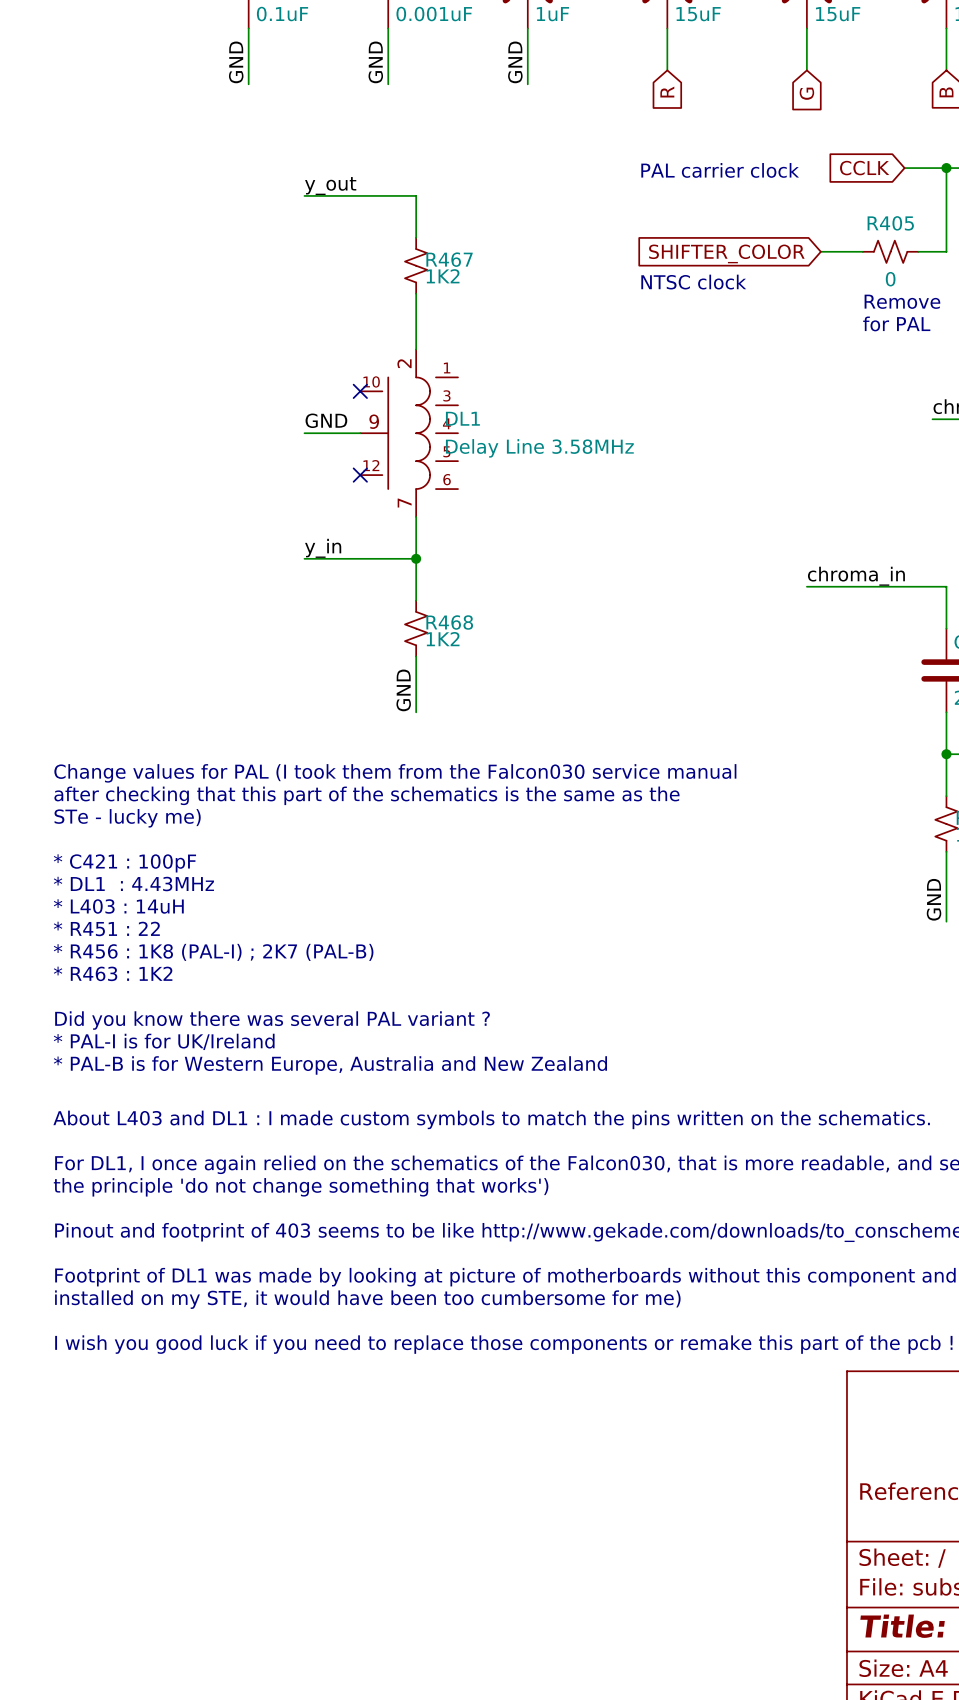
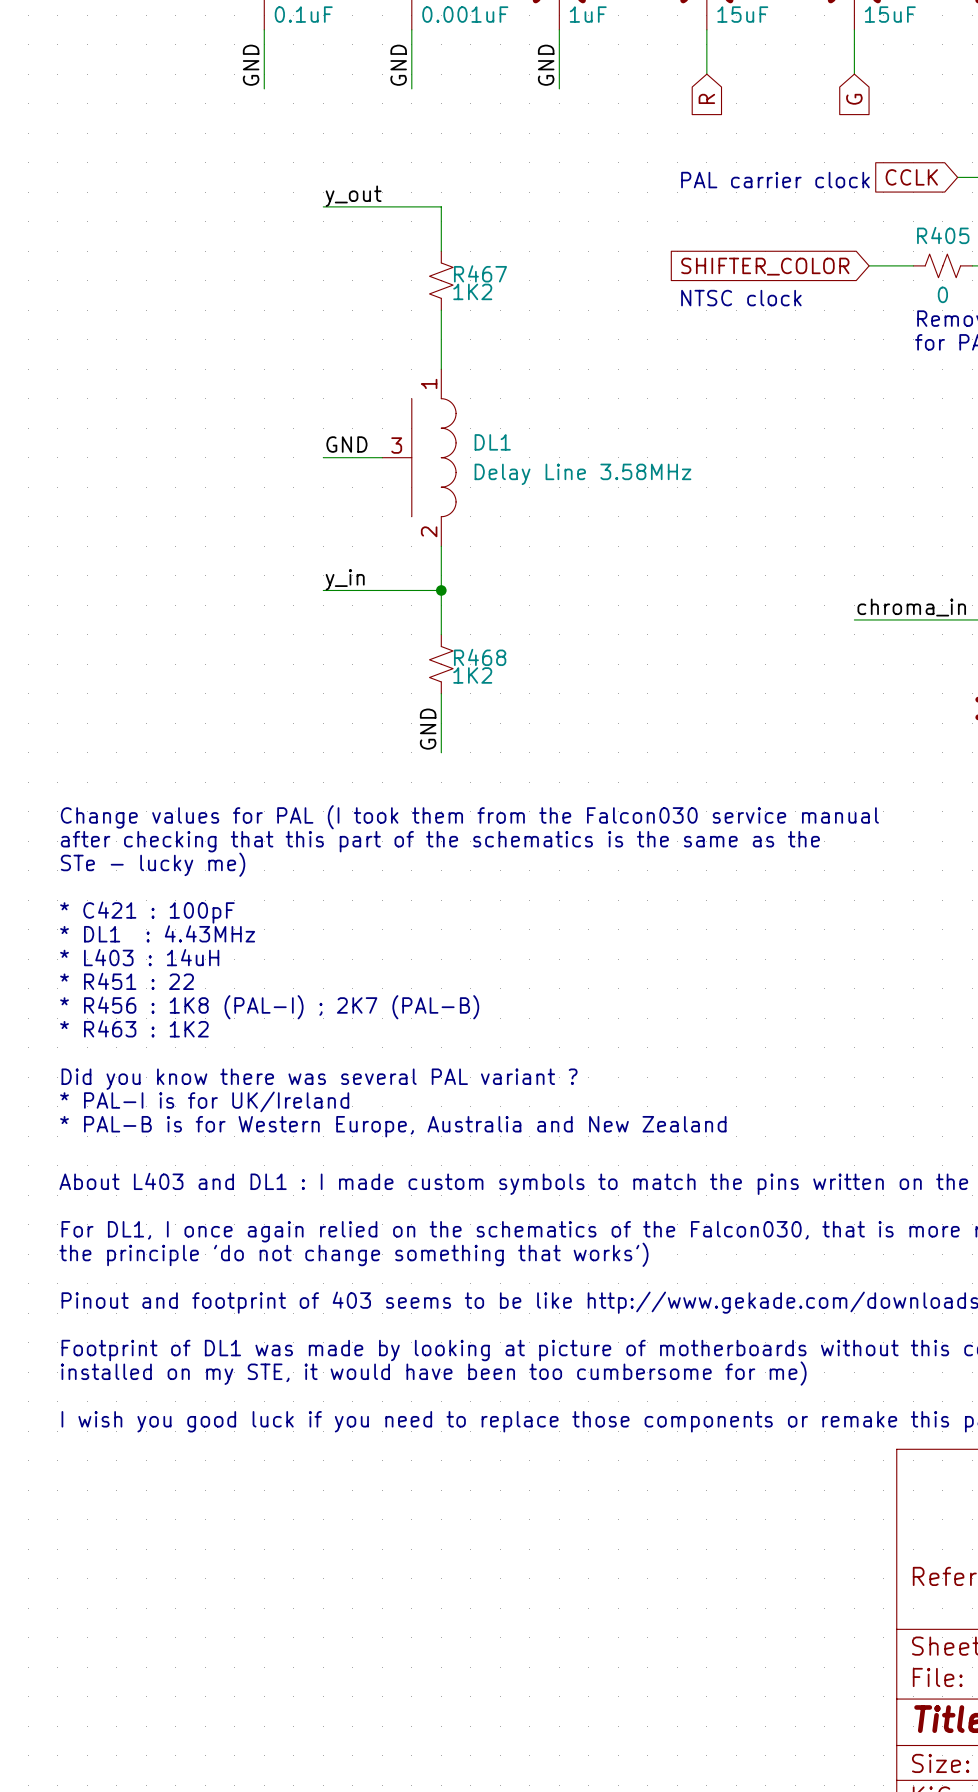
DL1 symbol: [360, 349, 459, 517] -> [382, 369, 457, 547]
no-connect mark: (360, 391) -> none
no-connect mark: (360, 475) -> none

